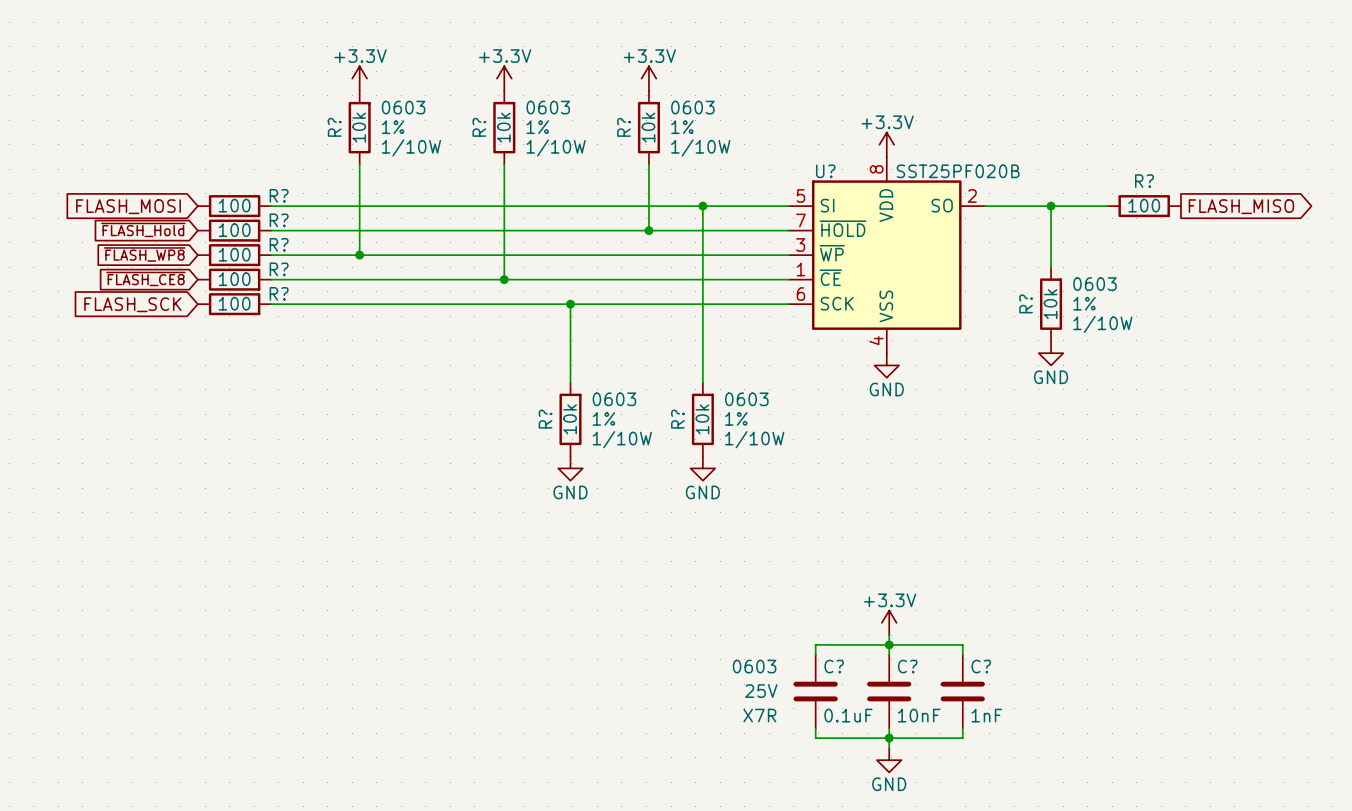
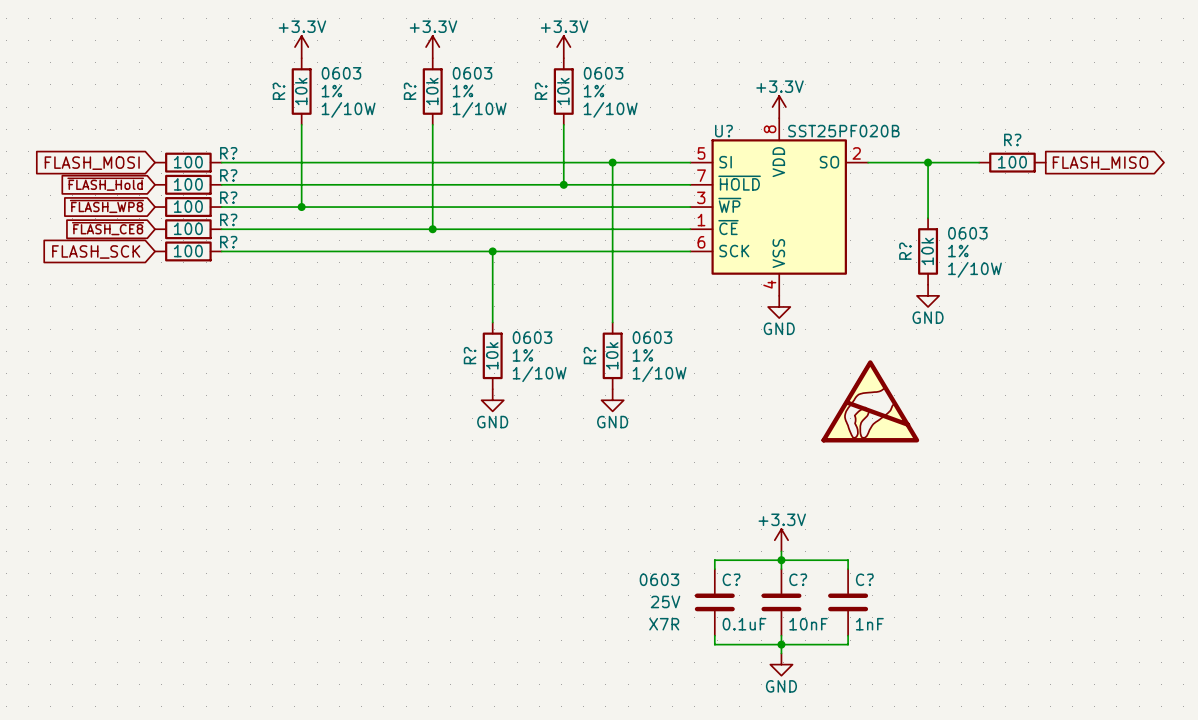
power symbol: none -> (870, 401)

